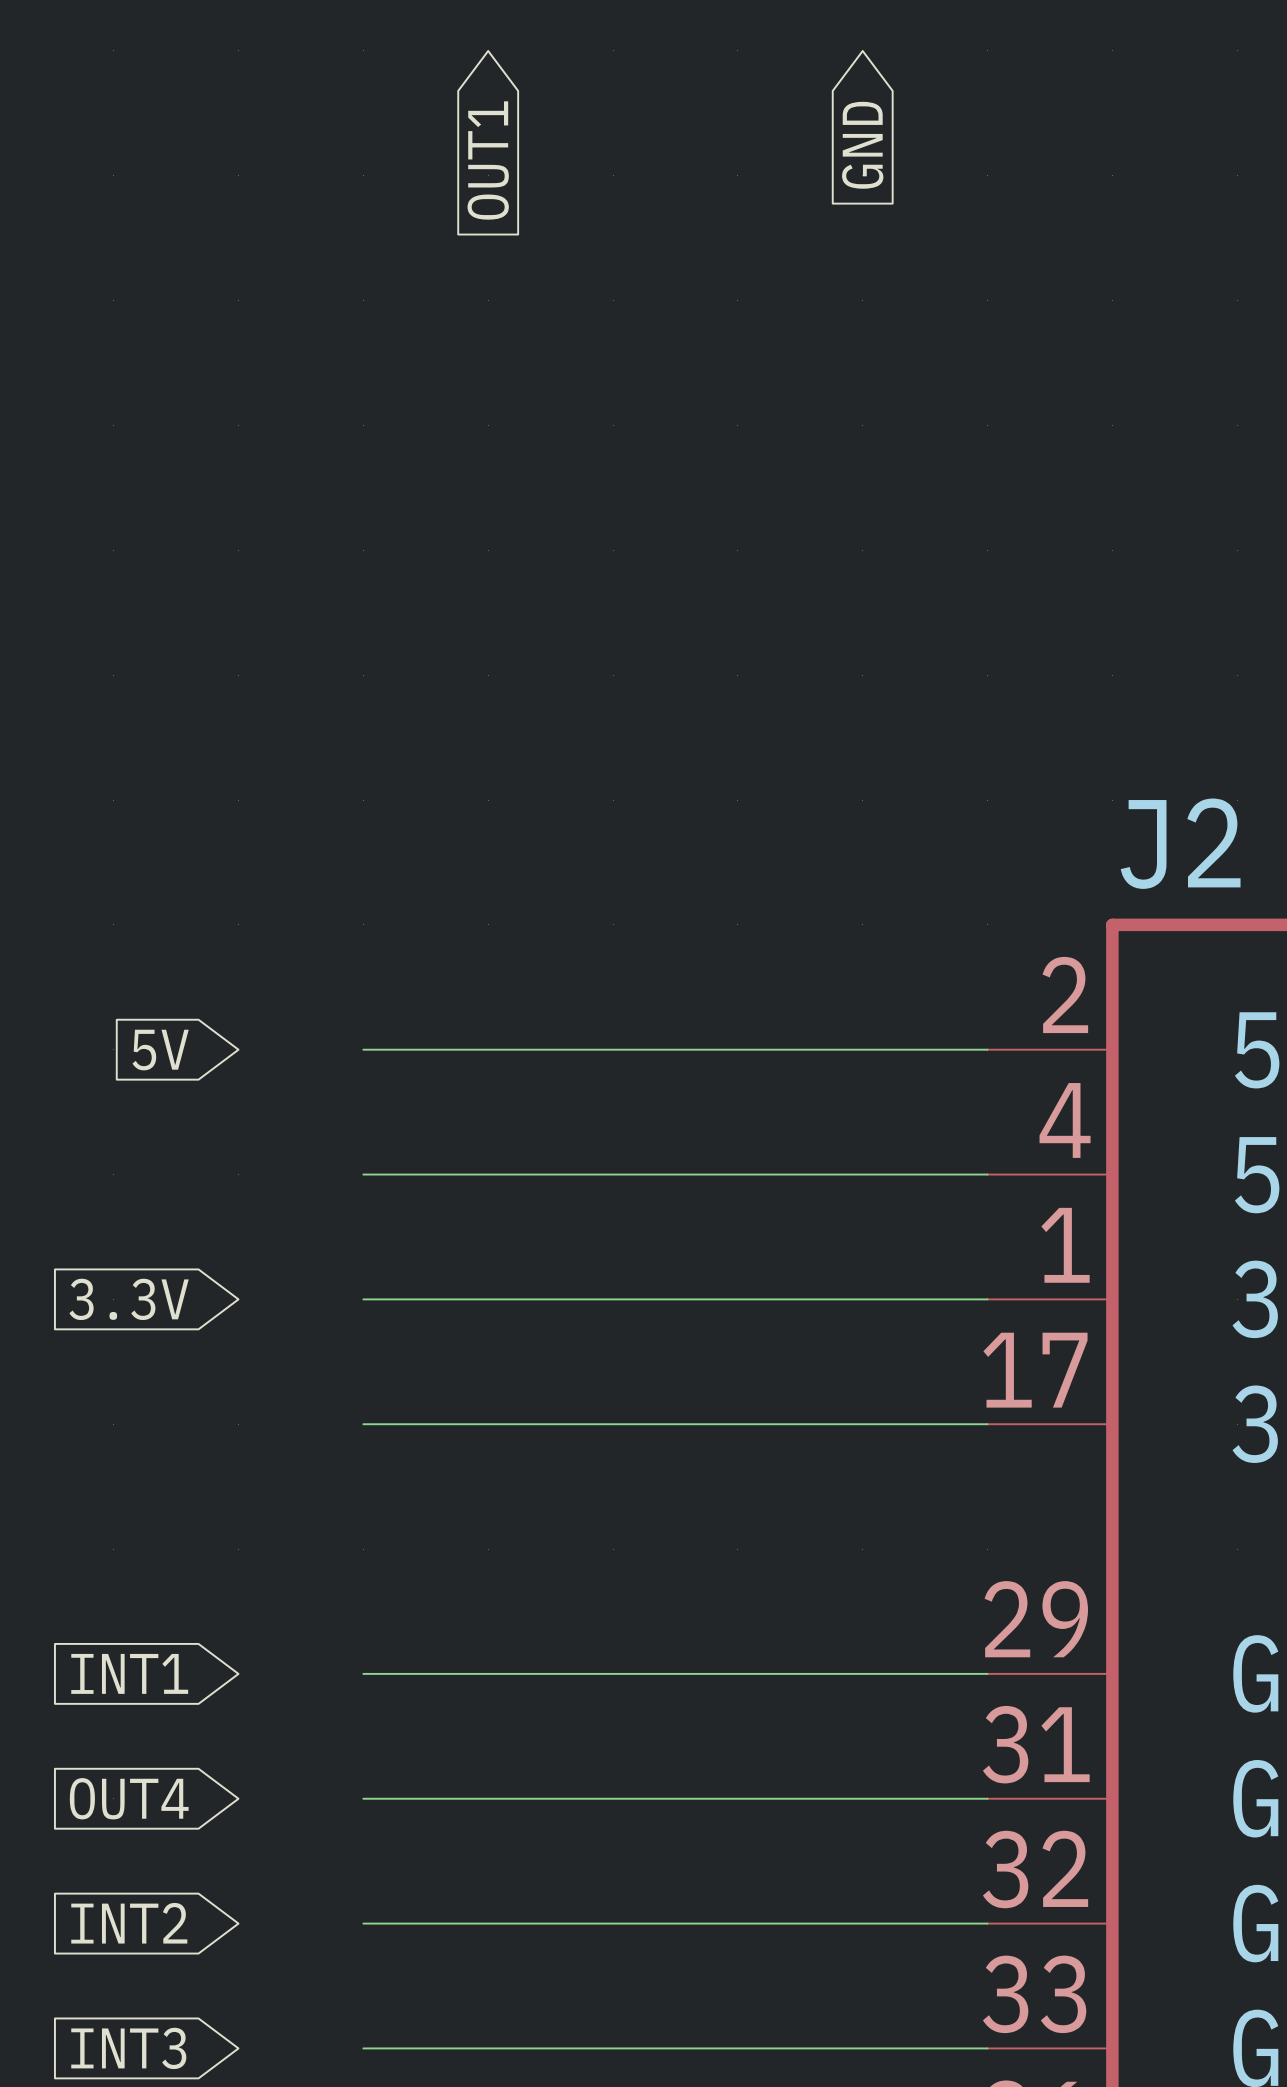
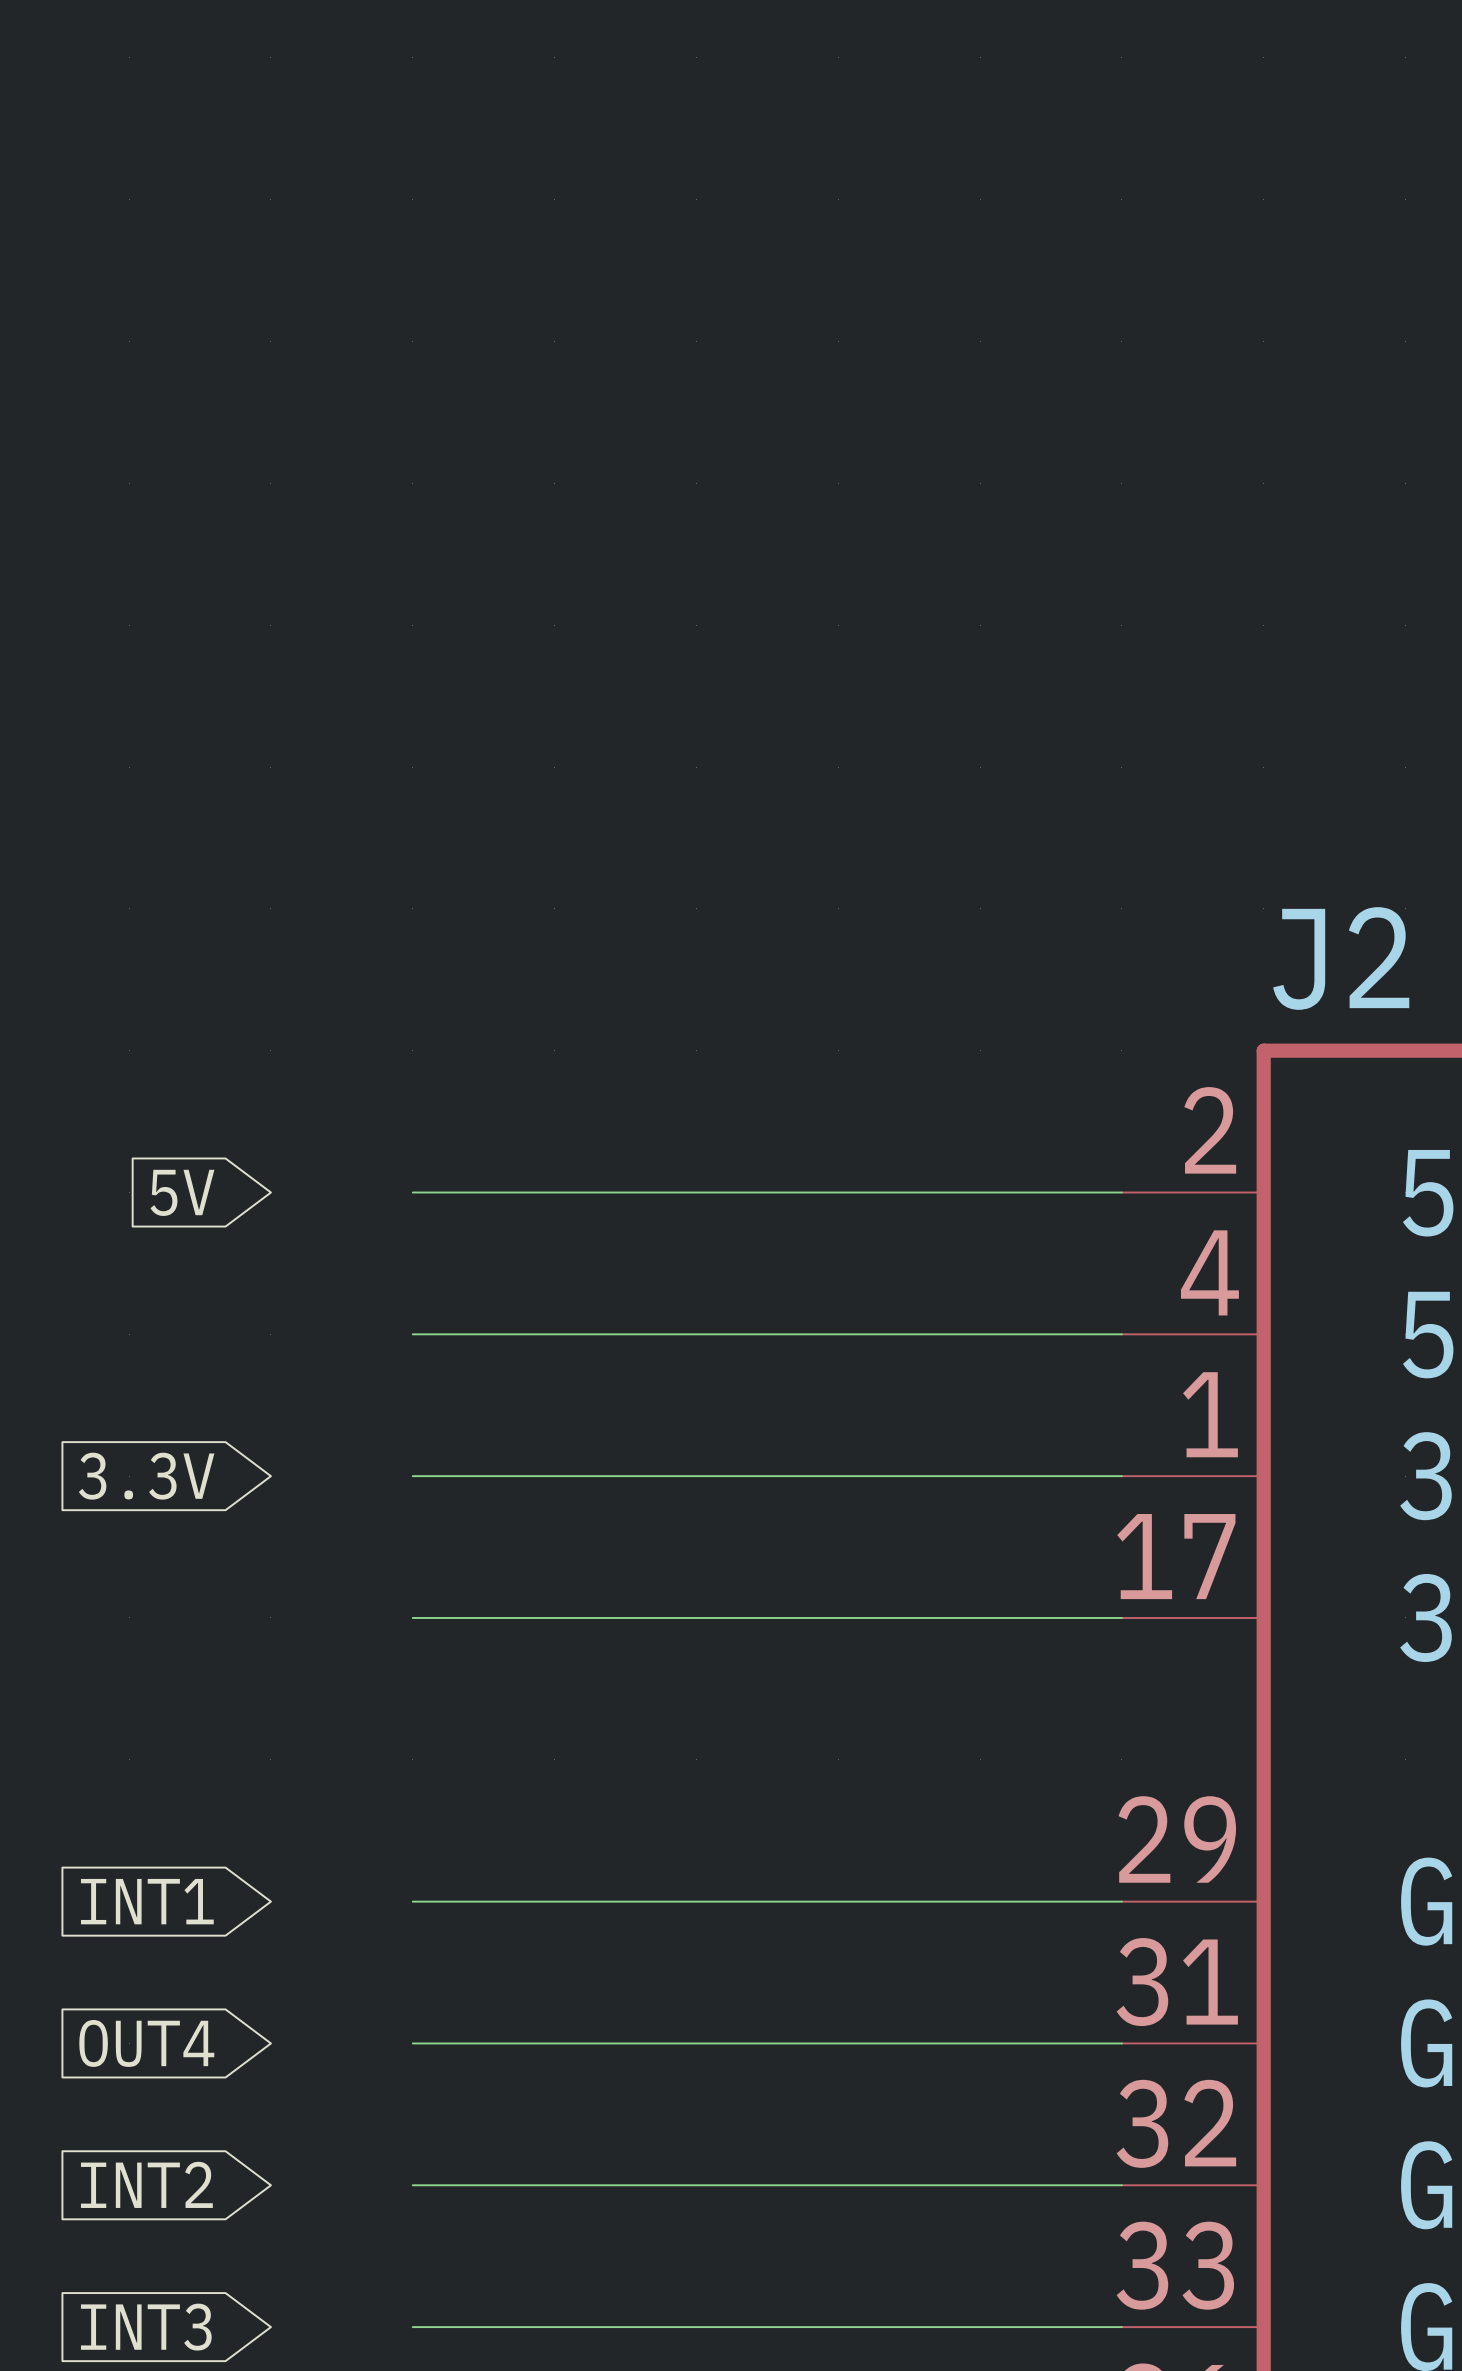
global label: GND (862, 145) -> none
global label: OUT1 (488, 160) -> none

